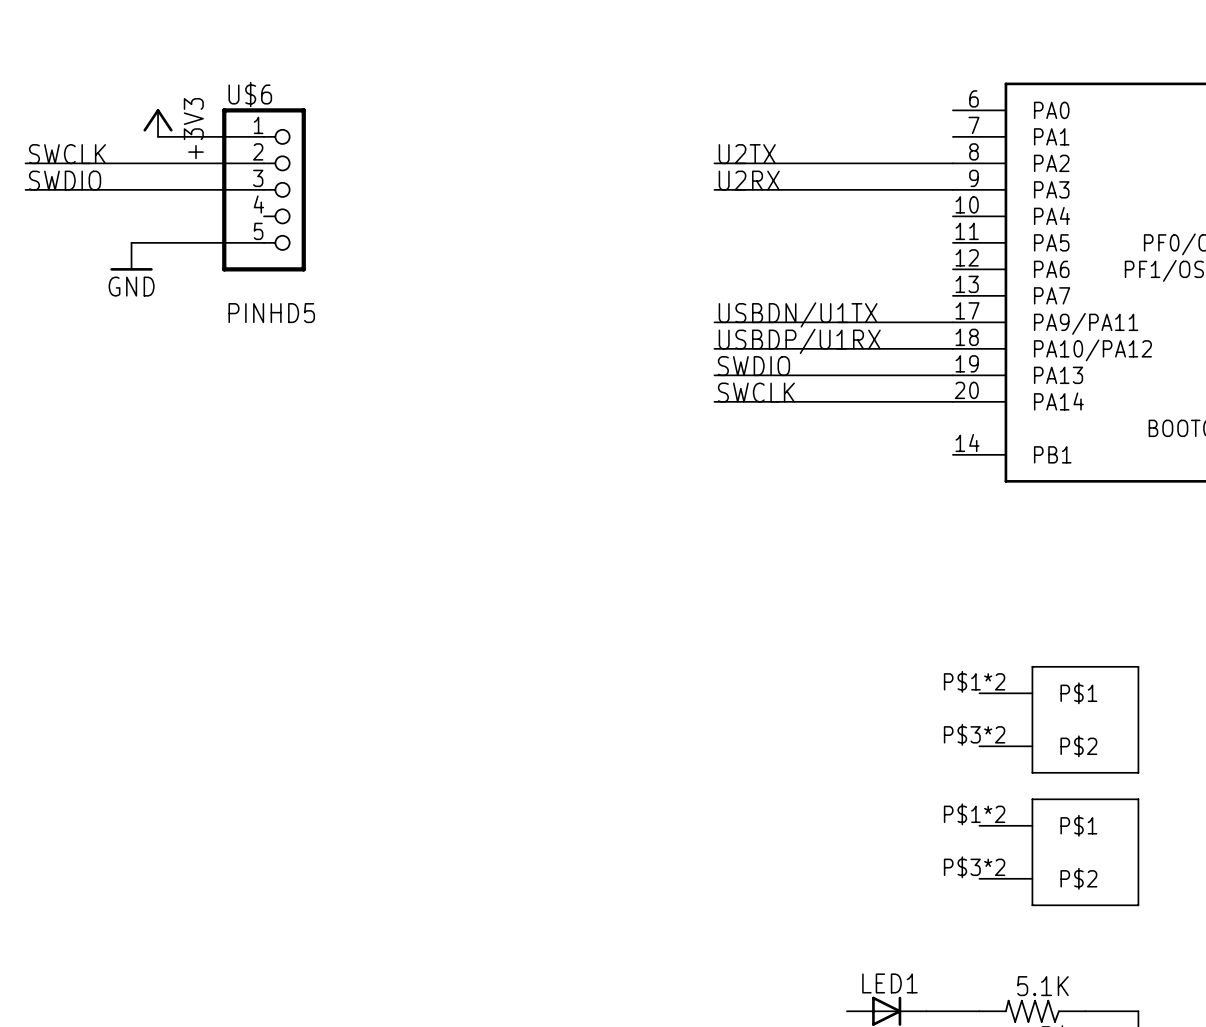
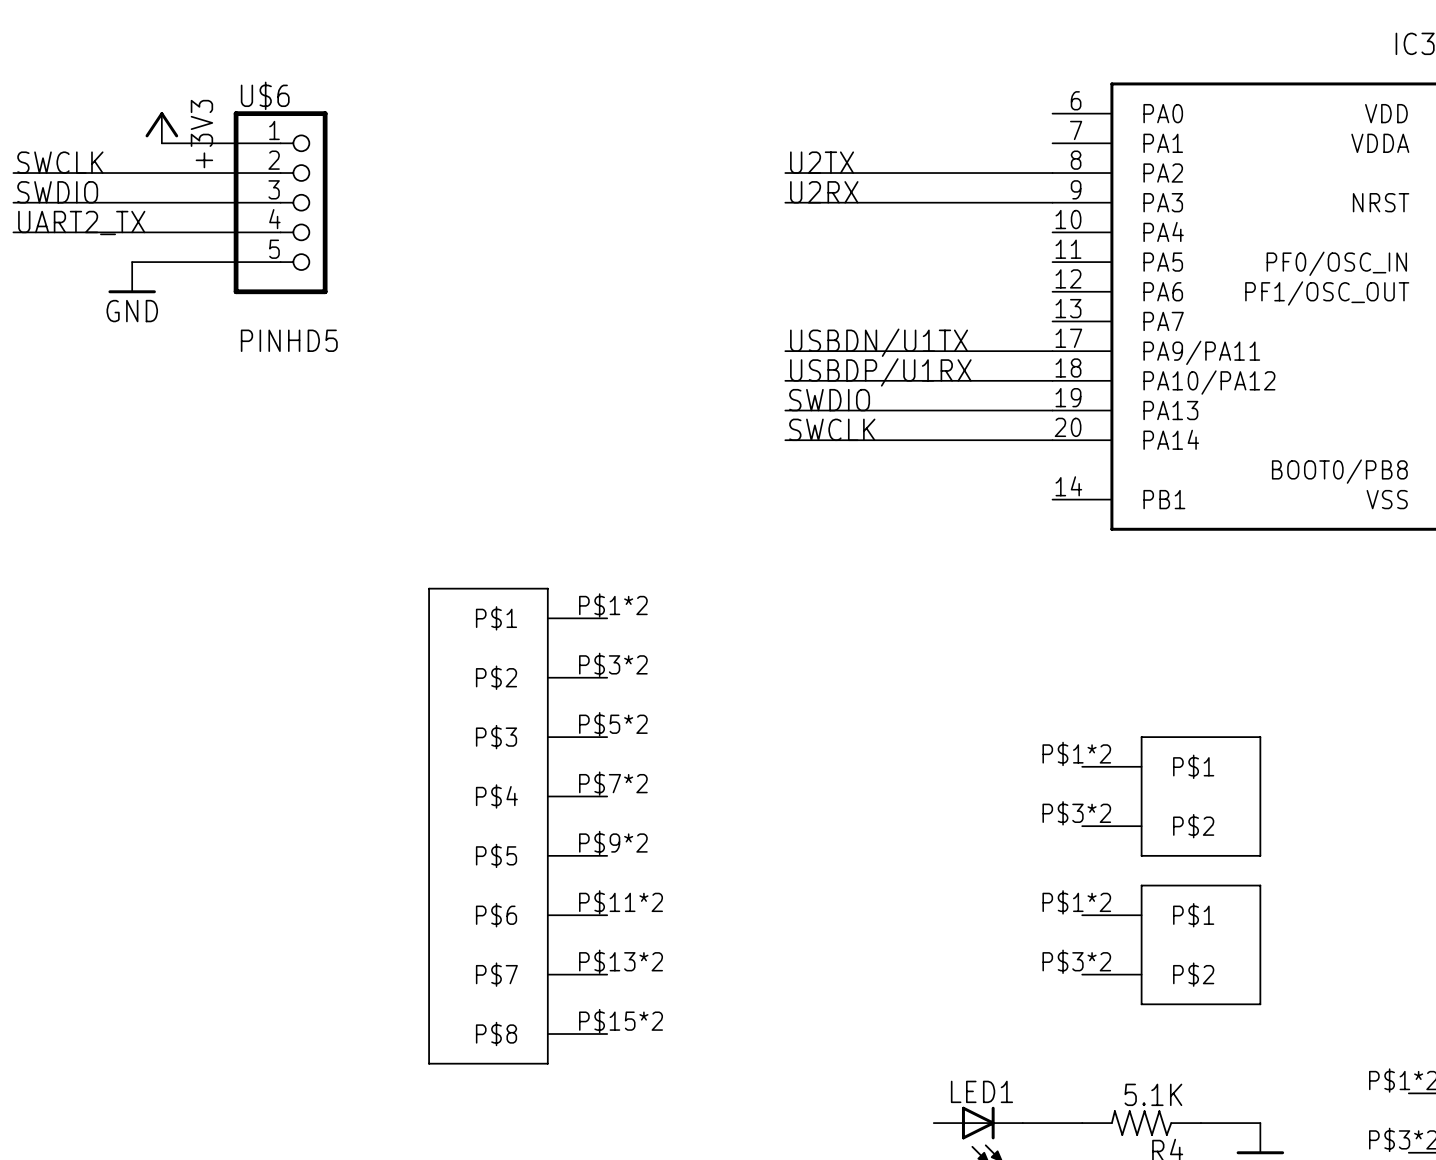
label: none -> UART2_TX (81, 222)
wire: none -> (13, 232) (280, 232)
part: none -> (517, 826)

